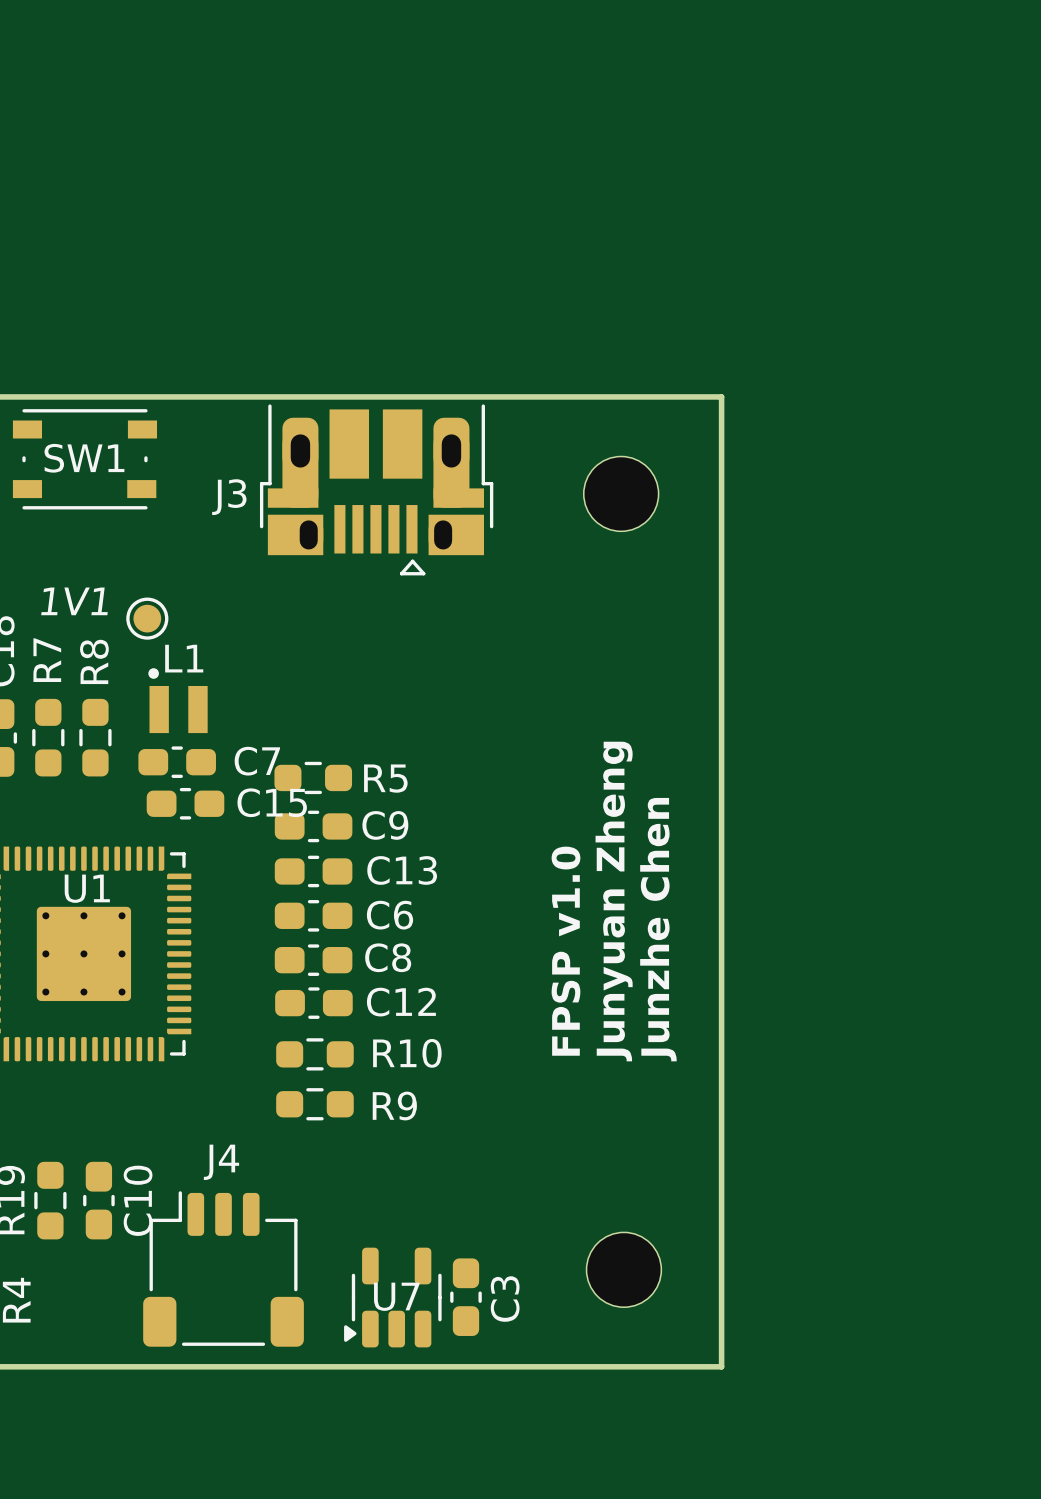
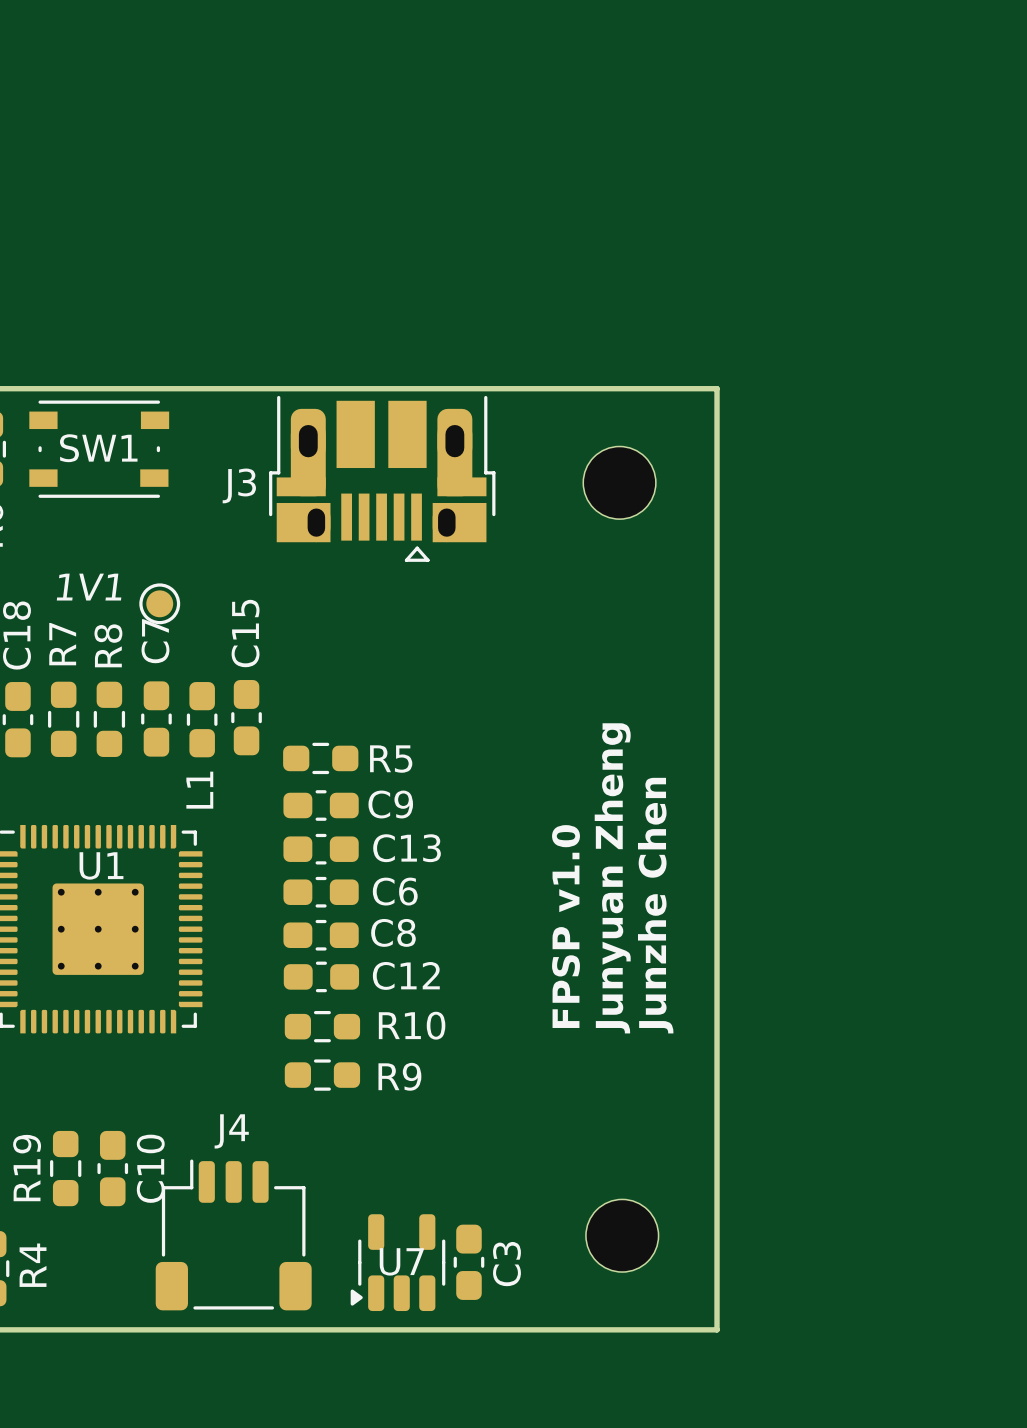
L1 name position: L1 (184, 658) -> L1 (199, 790)
L1 footprint: [148, 668, 208, 734] -> [186, 682, 218, 758]
C7 name position: C7 (257, 761) -> C7 (155, 641)
C7 rotation: 0° (177, 762) -> 90° clockwise (156, 719)
C15 name position: C15 (272, 802) -> C15 (245, 633)
C15 rotation: 0° (185, 803) -> 90° clockwise (246, 717)
C15 position: (185, 803) -> (246, 717)

